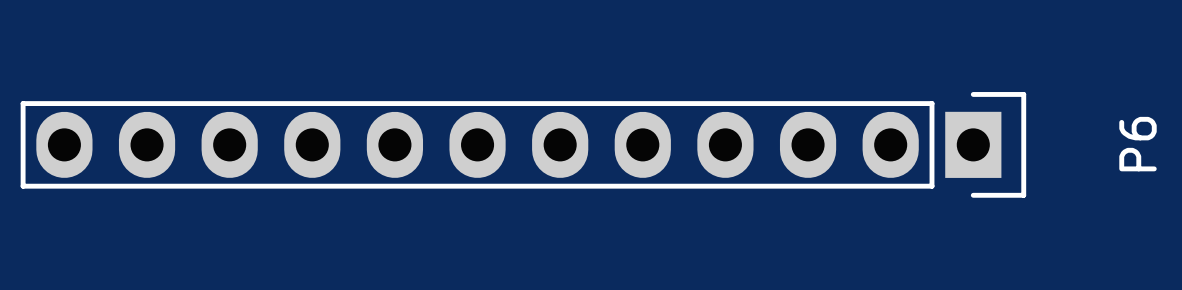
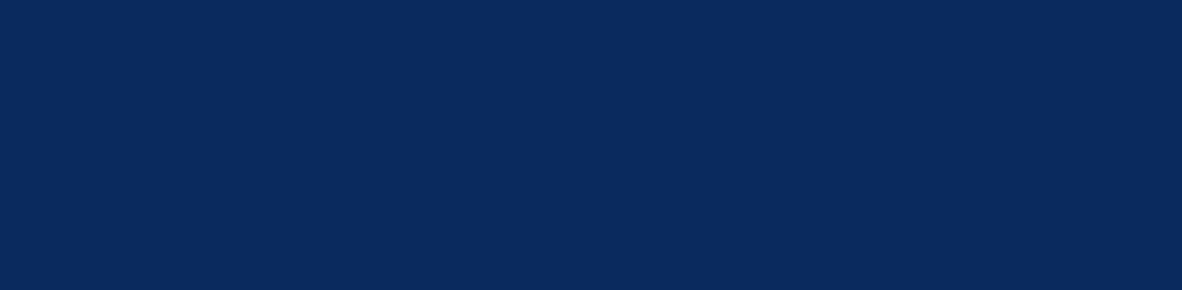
P6: (523, 144) -> none

